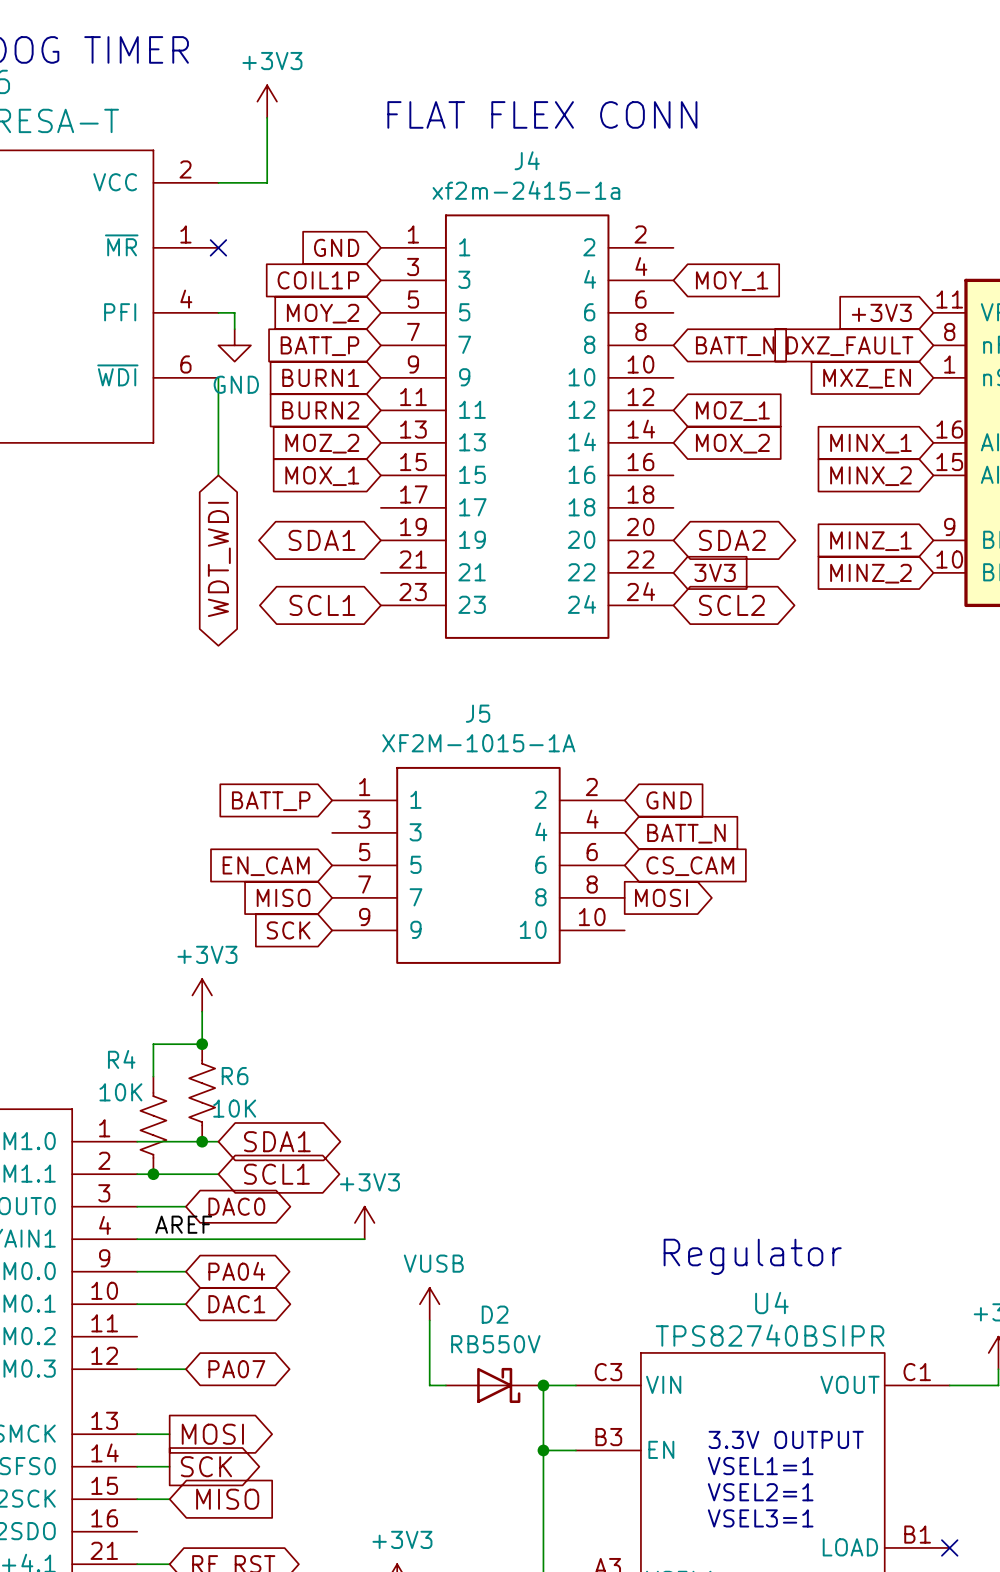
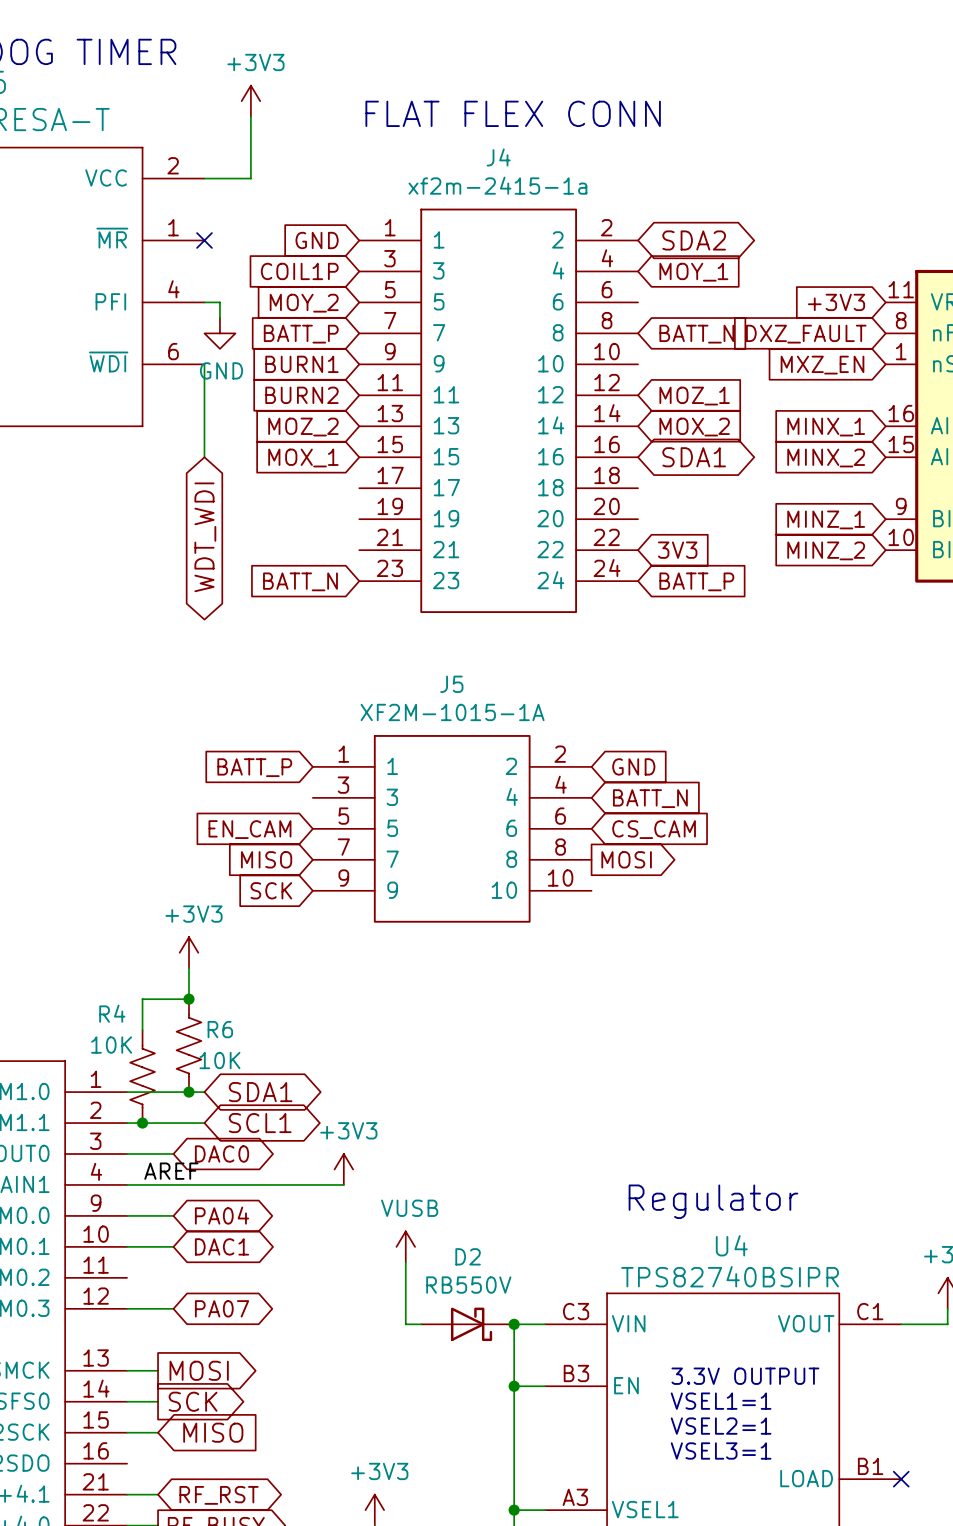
global label rotation: 0° (322, 540) -> 180° (694, 457)
global label position: SDA1 (322, 540) -> SDA1 (694, 457)
global label position: SDA2 (732, 540) -> SDA2 (694, 240)
global label shape: bidirectional (322, 605) -> input (300, 581)
global label: SCL1 (322, 605) -> BATT_N (300, 581)
global label shape: bidirectional (731, 605) -> input (696, 581)
global label: SCL2 (731, 605) -> BATT_P (696, 581)

